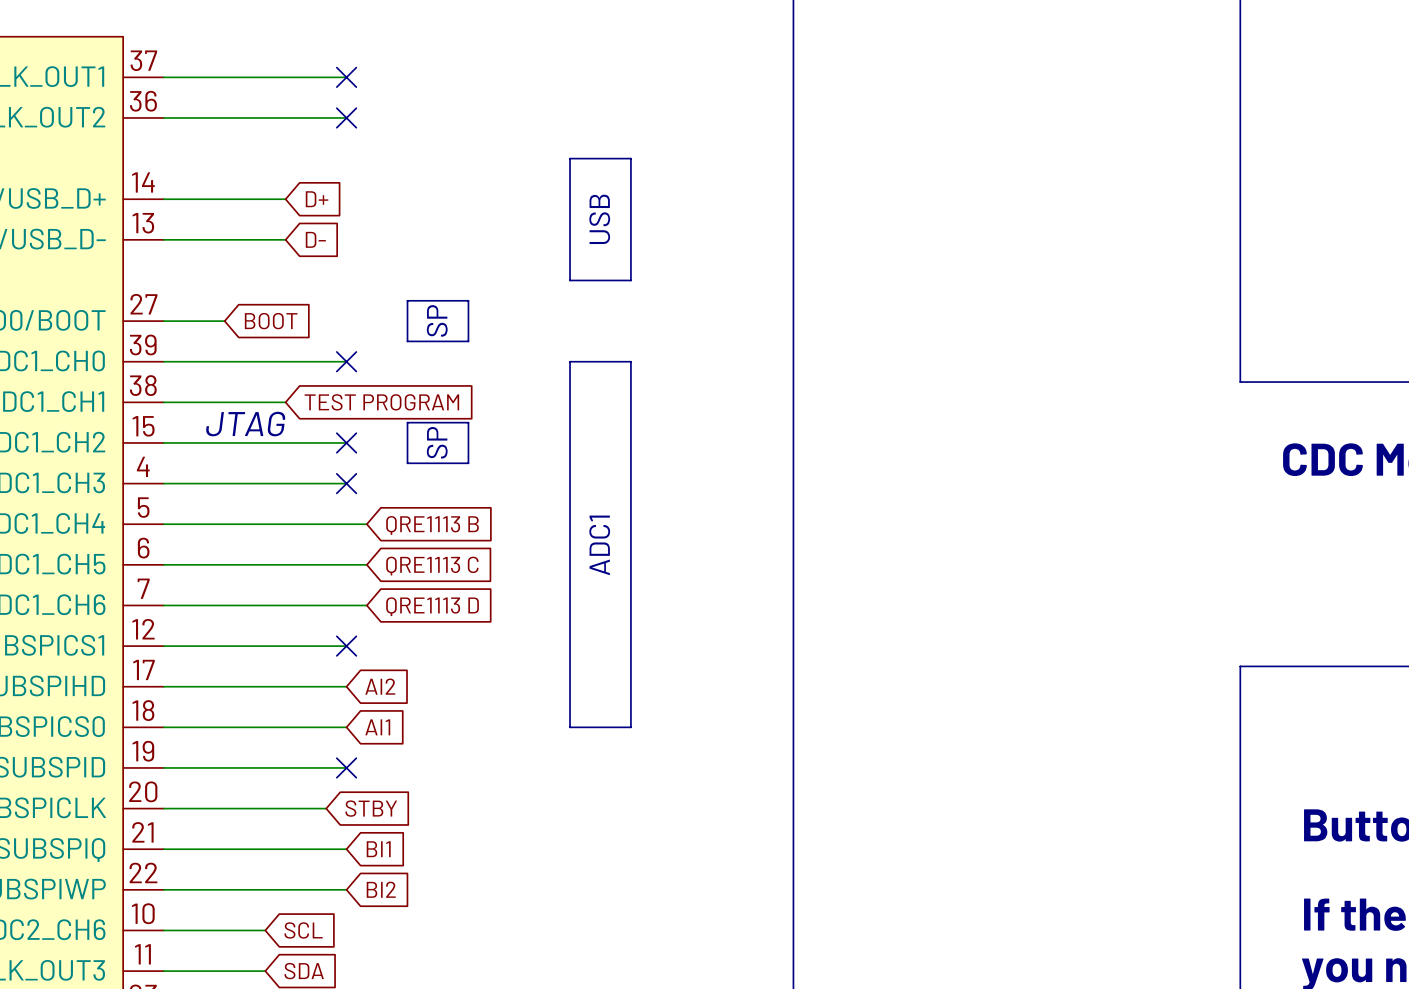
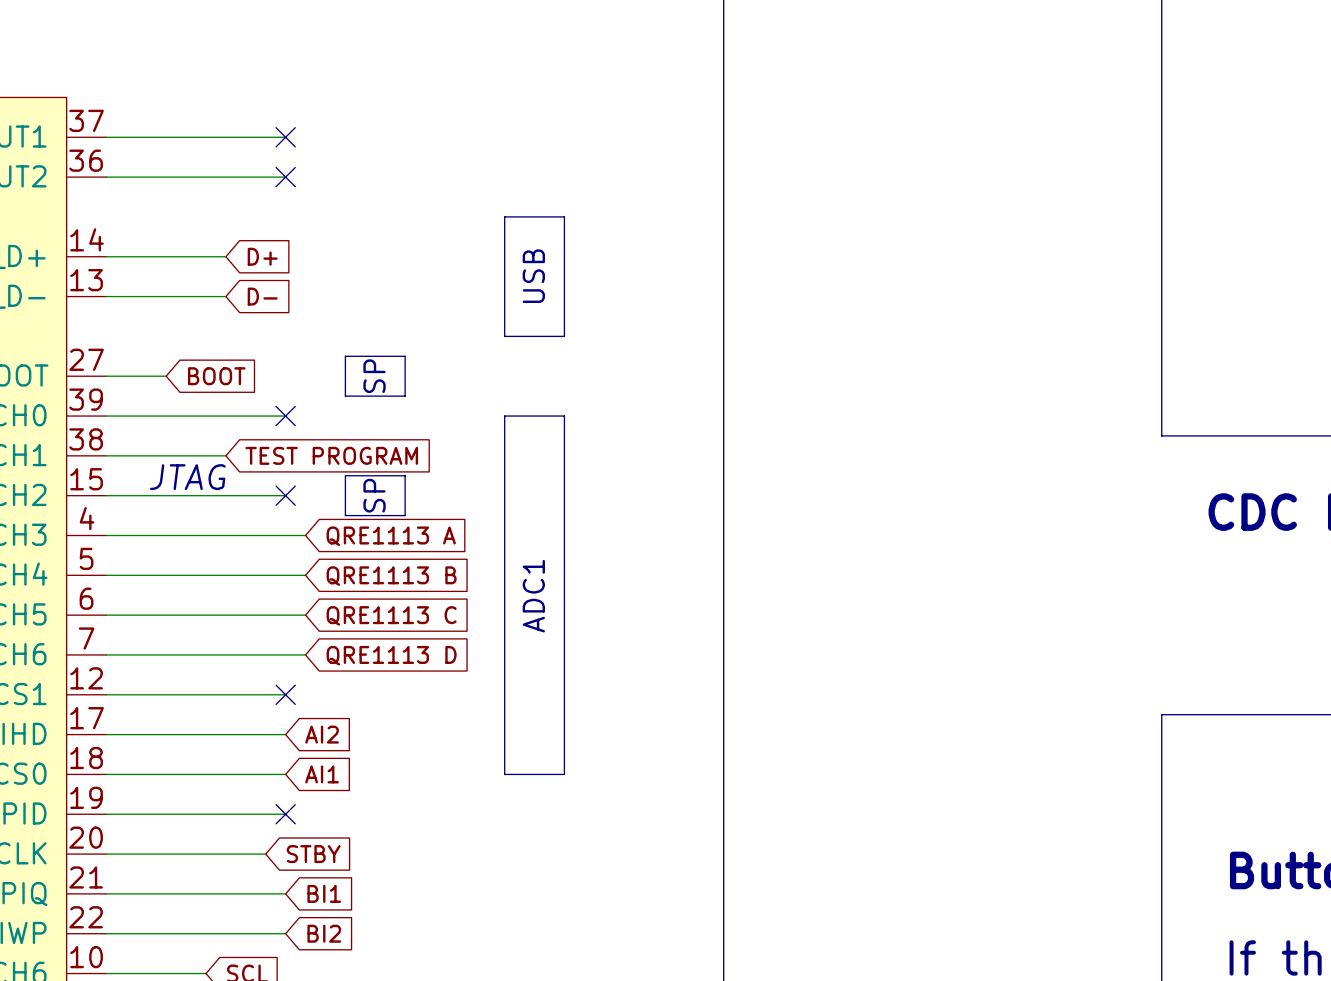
wire: none -> (285, 535) (305, 535)
no-connect mark: (346, 483) -> none
global label: none -> QRE1113 A (391, 536)

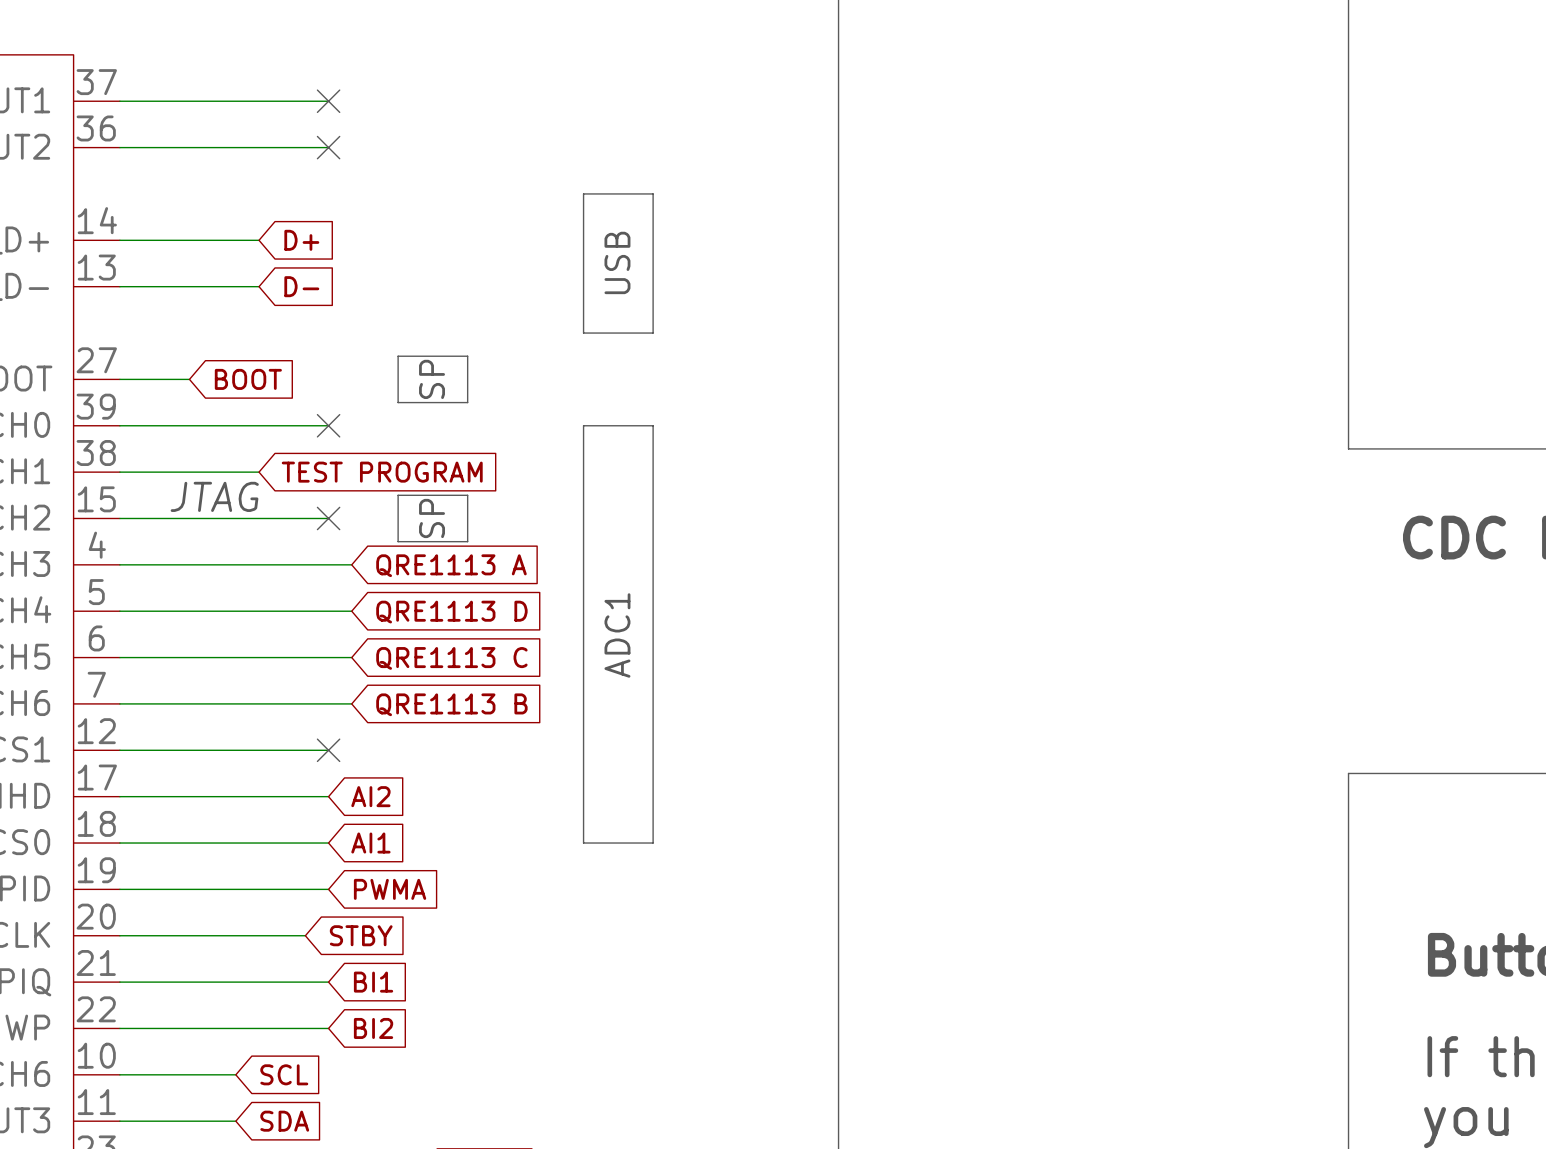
global label: QRE1113 B (391, 576) -> QRE1113 D (451, 612)
global label: QRE1113 D (391, 655) -> QRE1113 B (451, 704)
no-connect mark: (285, 814) -> none
global label: none -> PWMA (390, 889)

